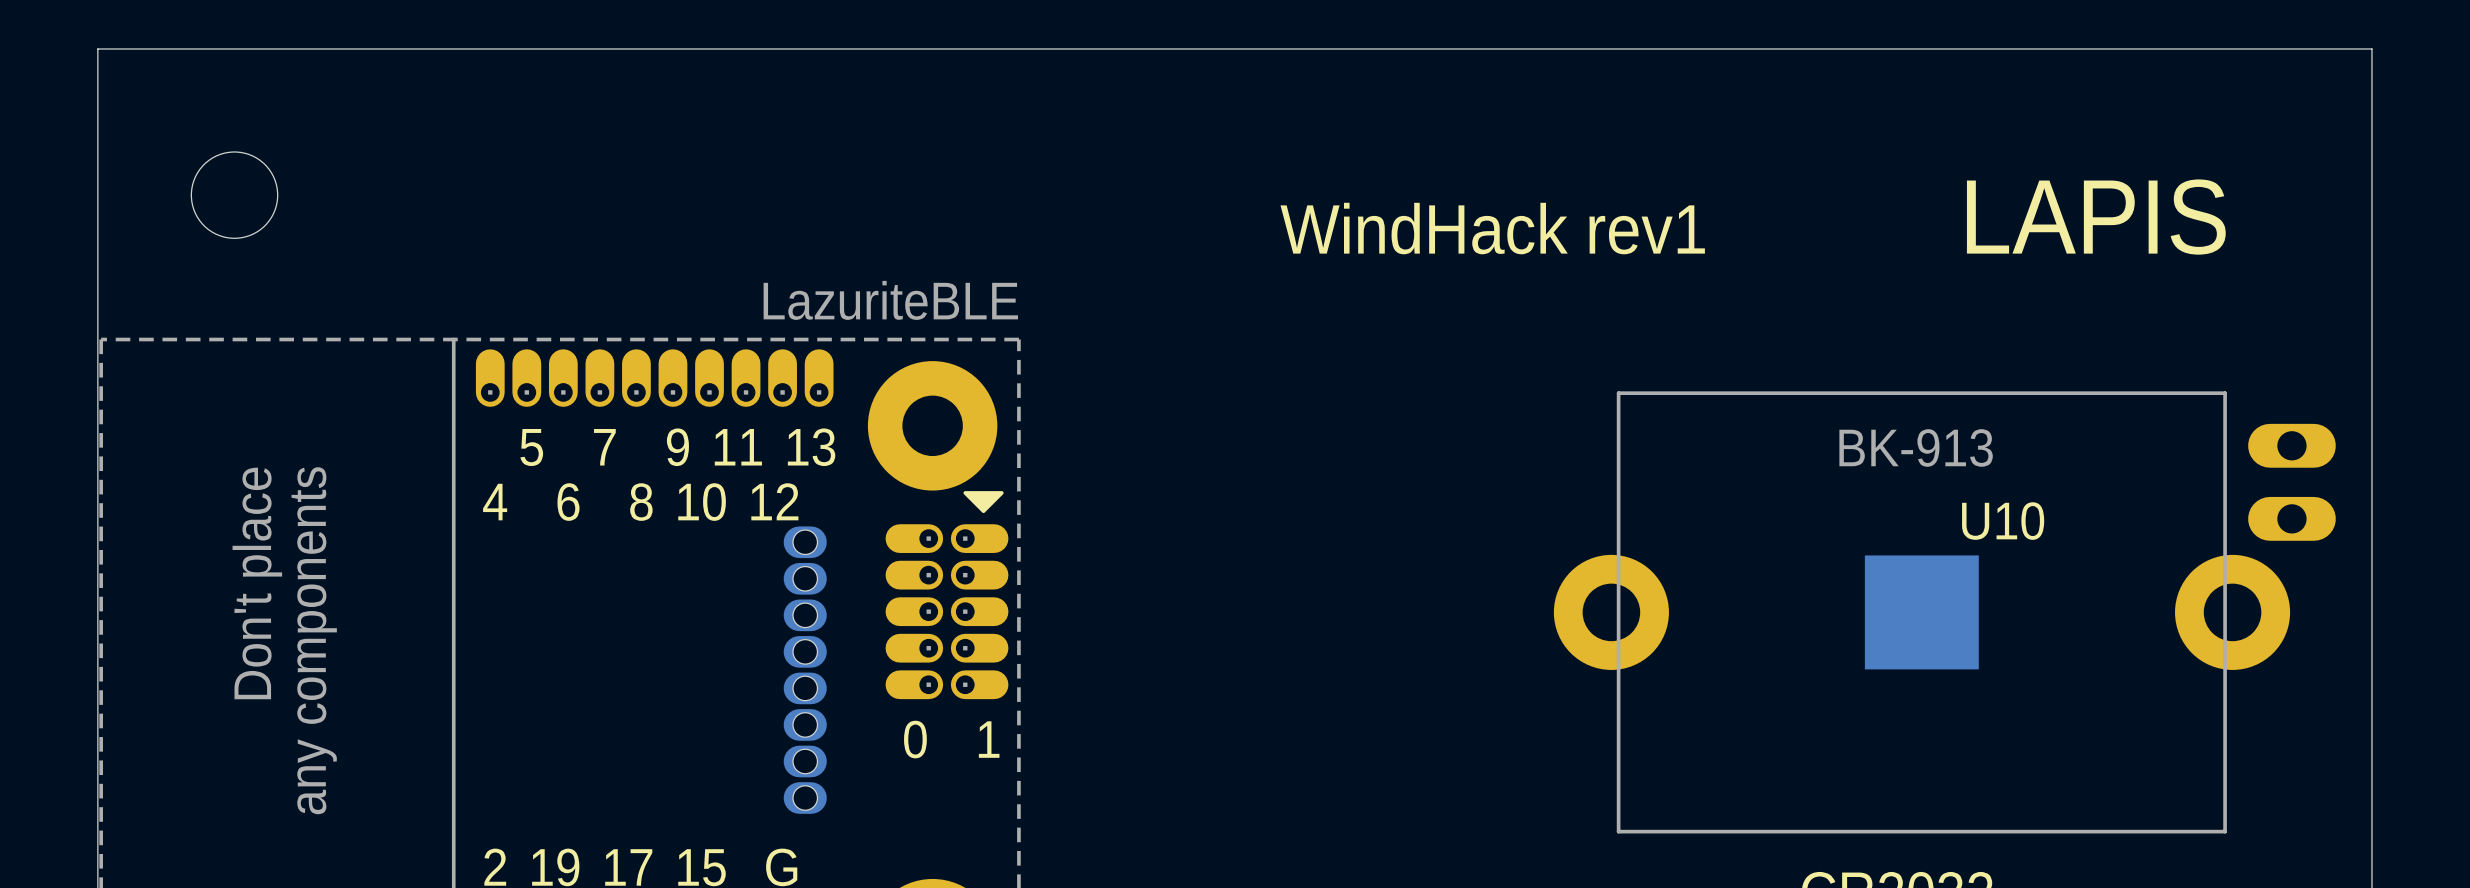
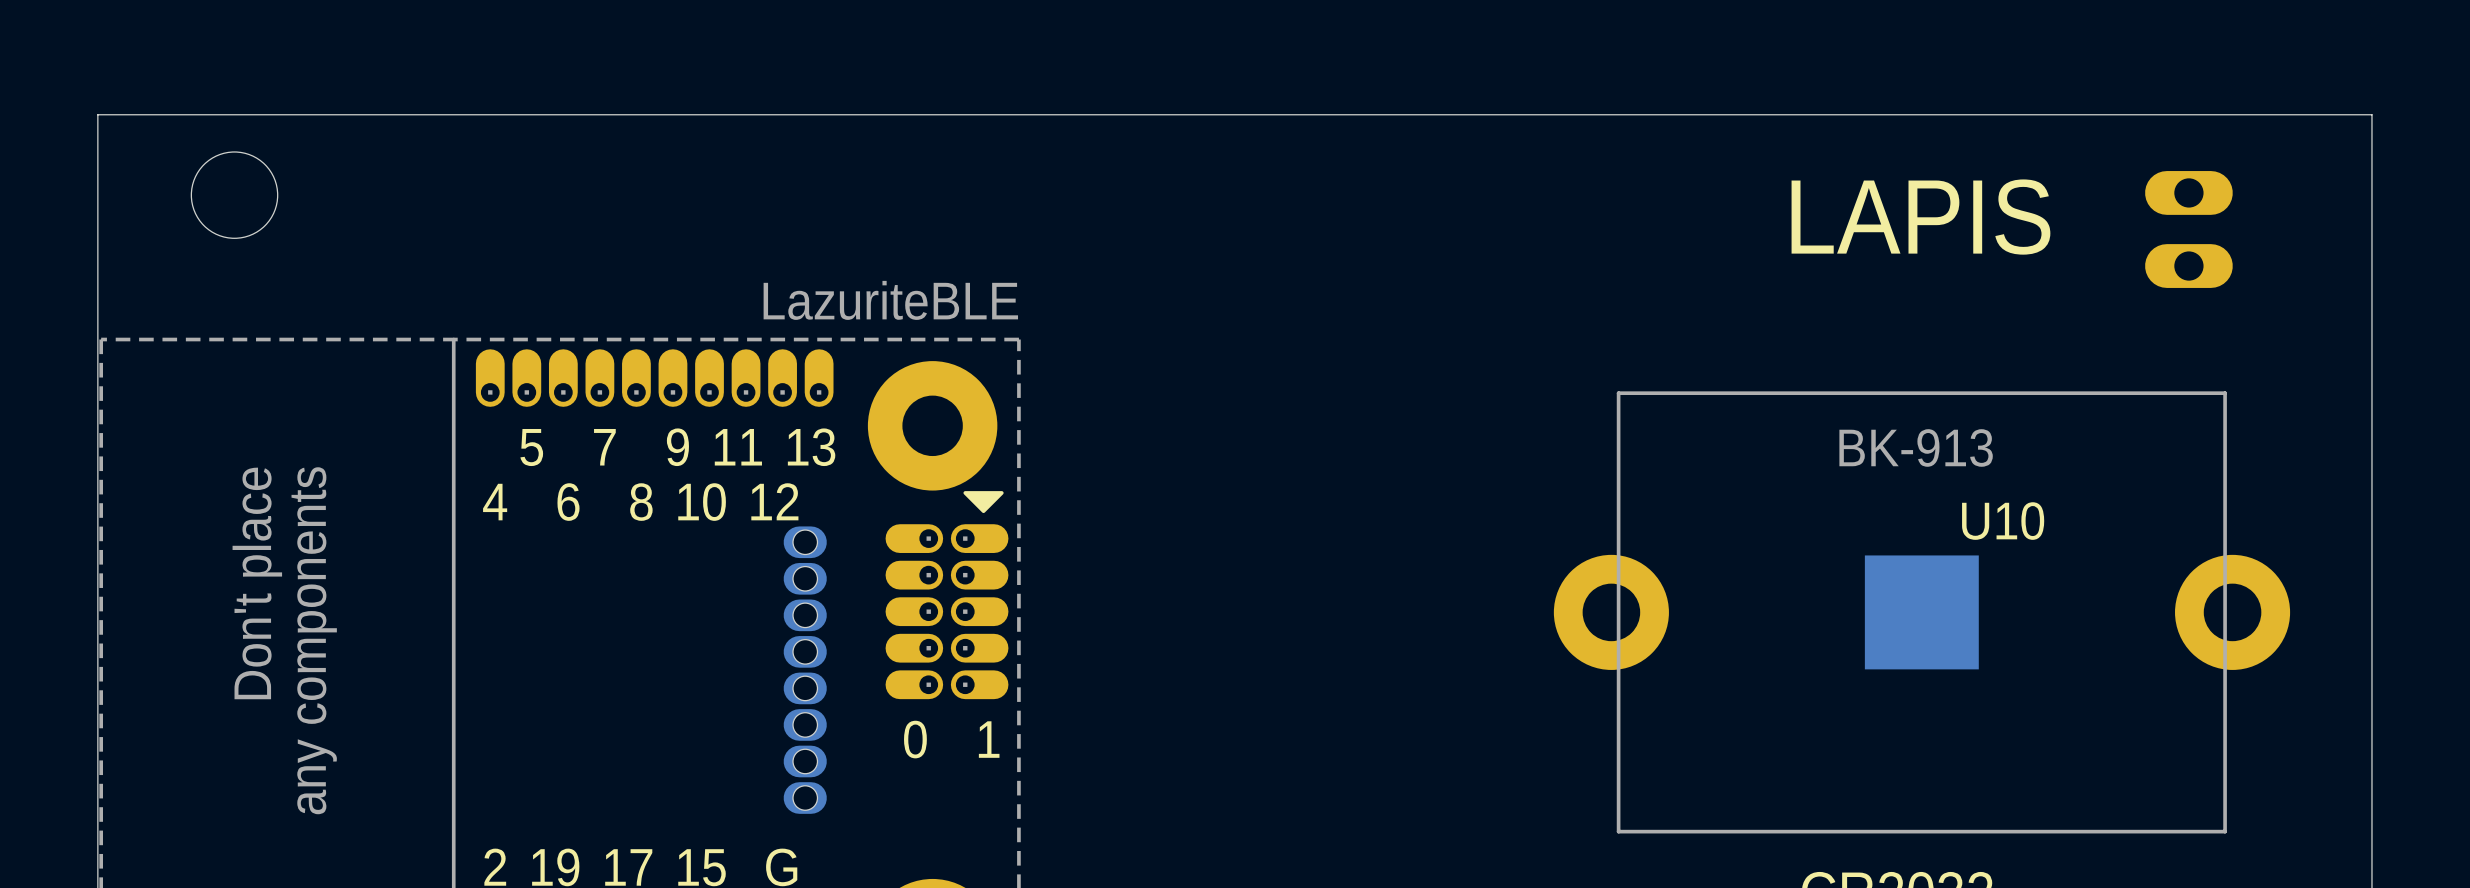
board edge: (2371, 114) (2371, 48) (97, 48) (97, 114) -> (2371, 114) (97, 114)
text position: LAPIS (2096, 217) -> LAPIS (1920, 217)
text: WindHack rev1 (1492, 228) -> none
part position: (2291, 482) -> (2188, 229)

